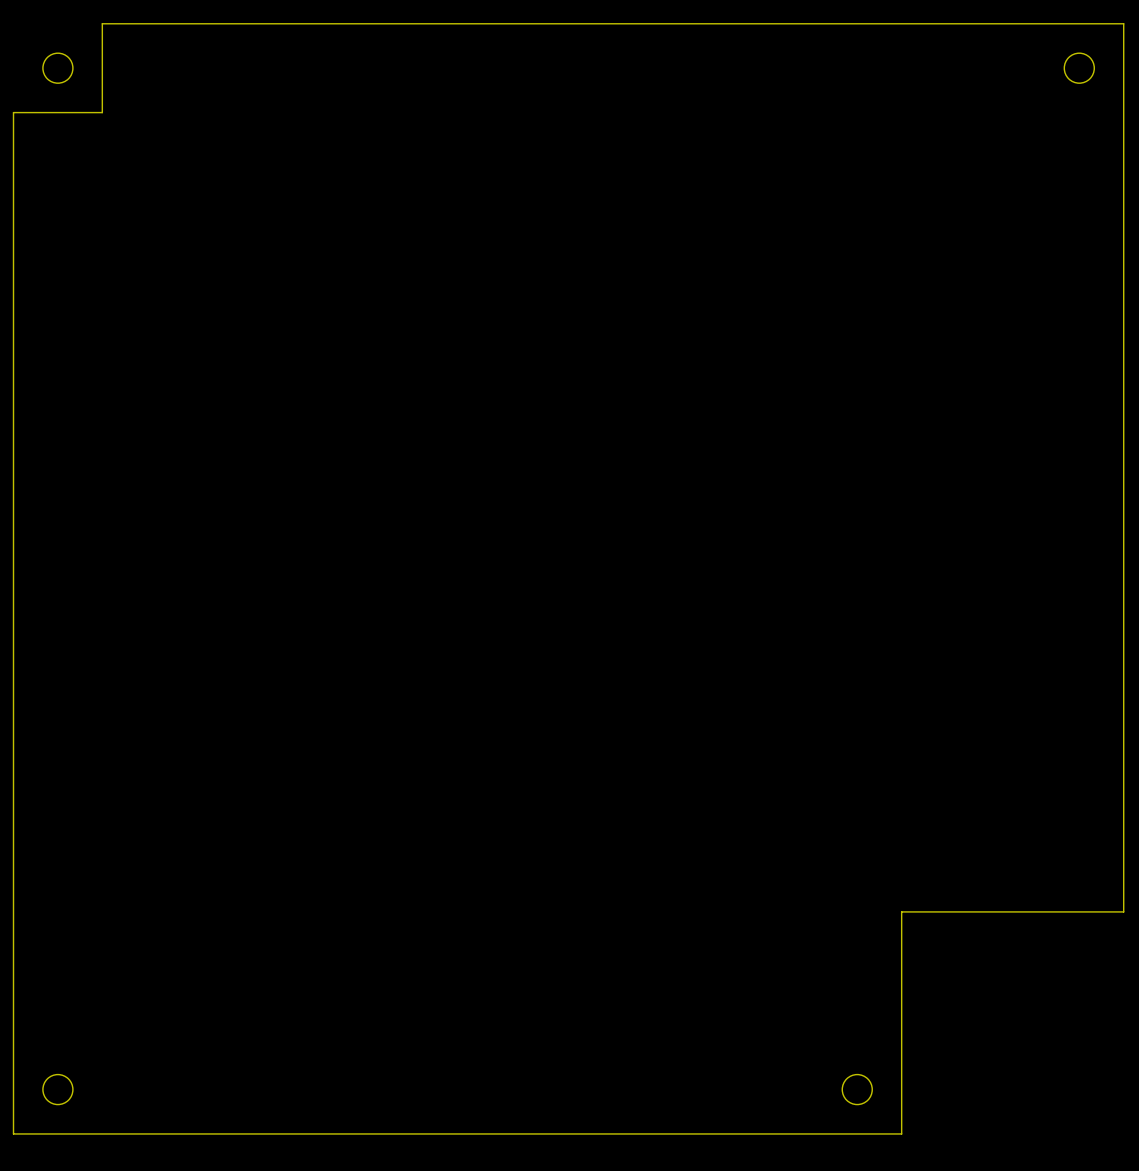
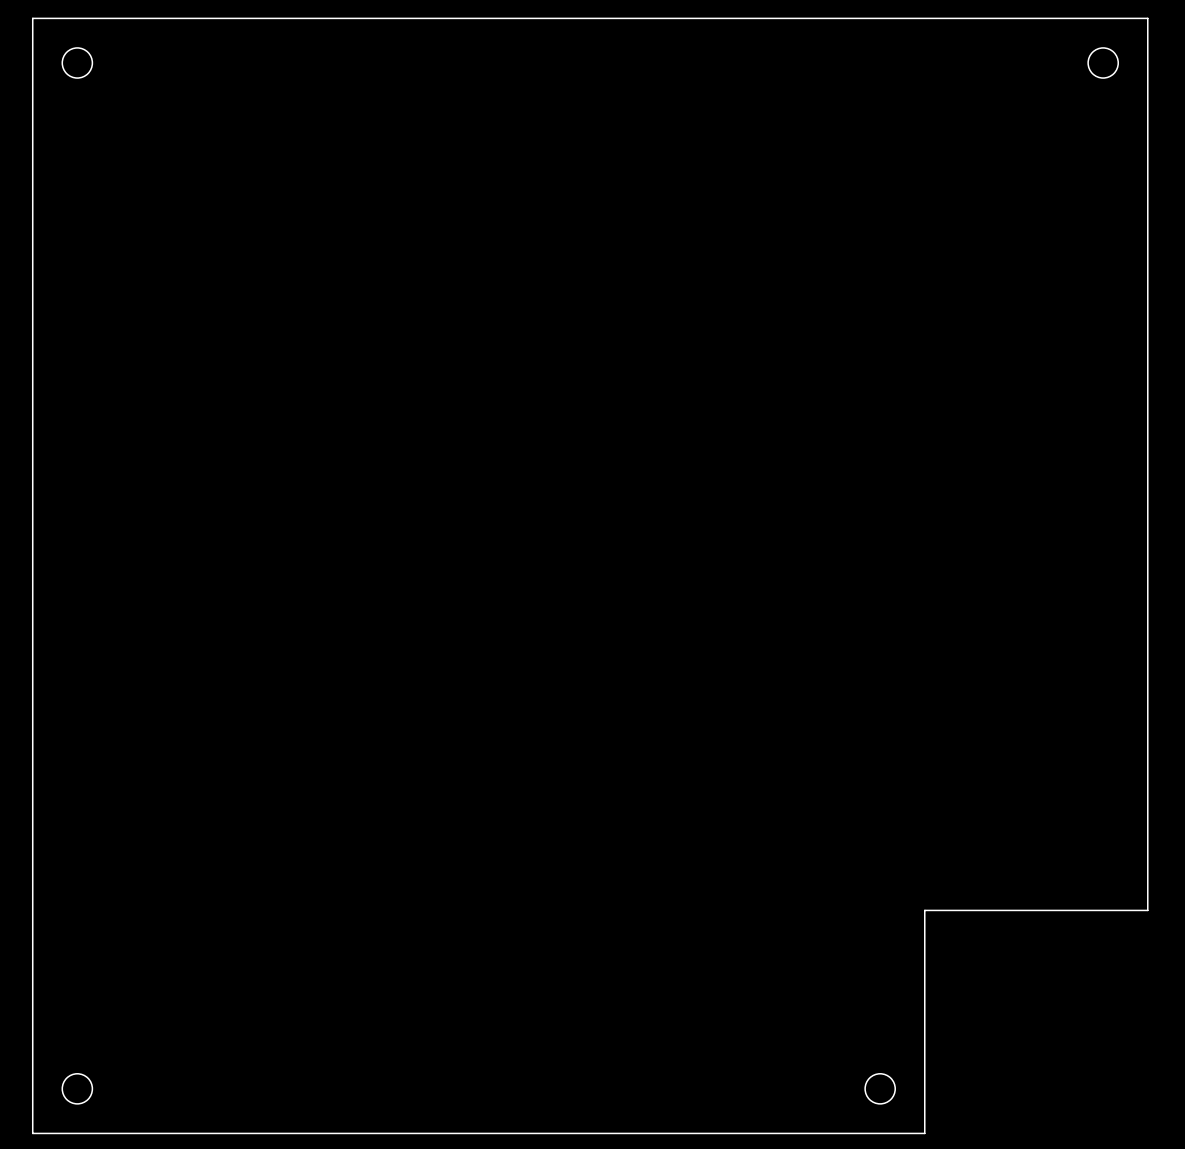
board edge: (102, 23) (102, 112) (13, 112) -> (121, 18) (32, 18) (32, 107)

